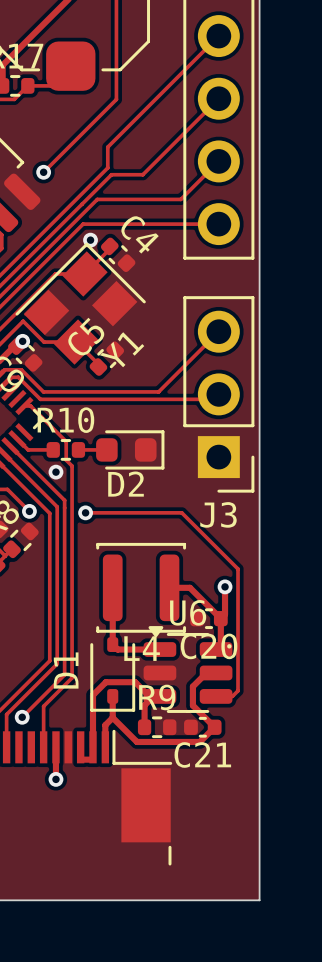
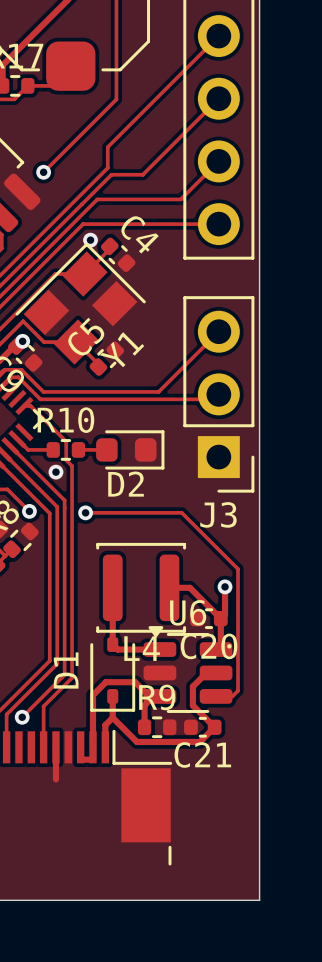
via: (55, 779) -> none

